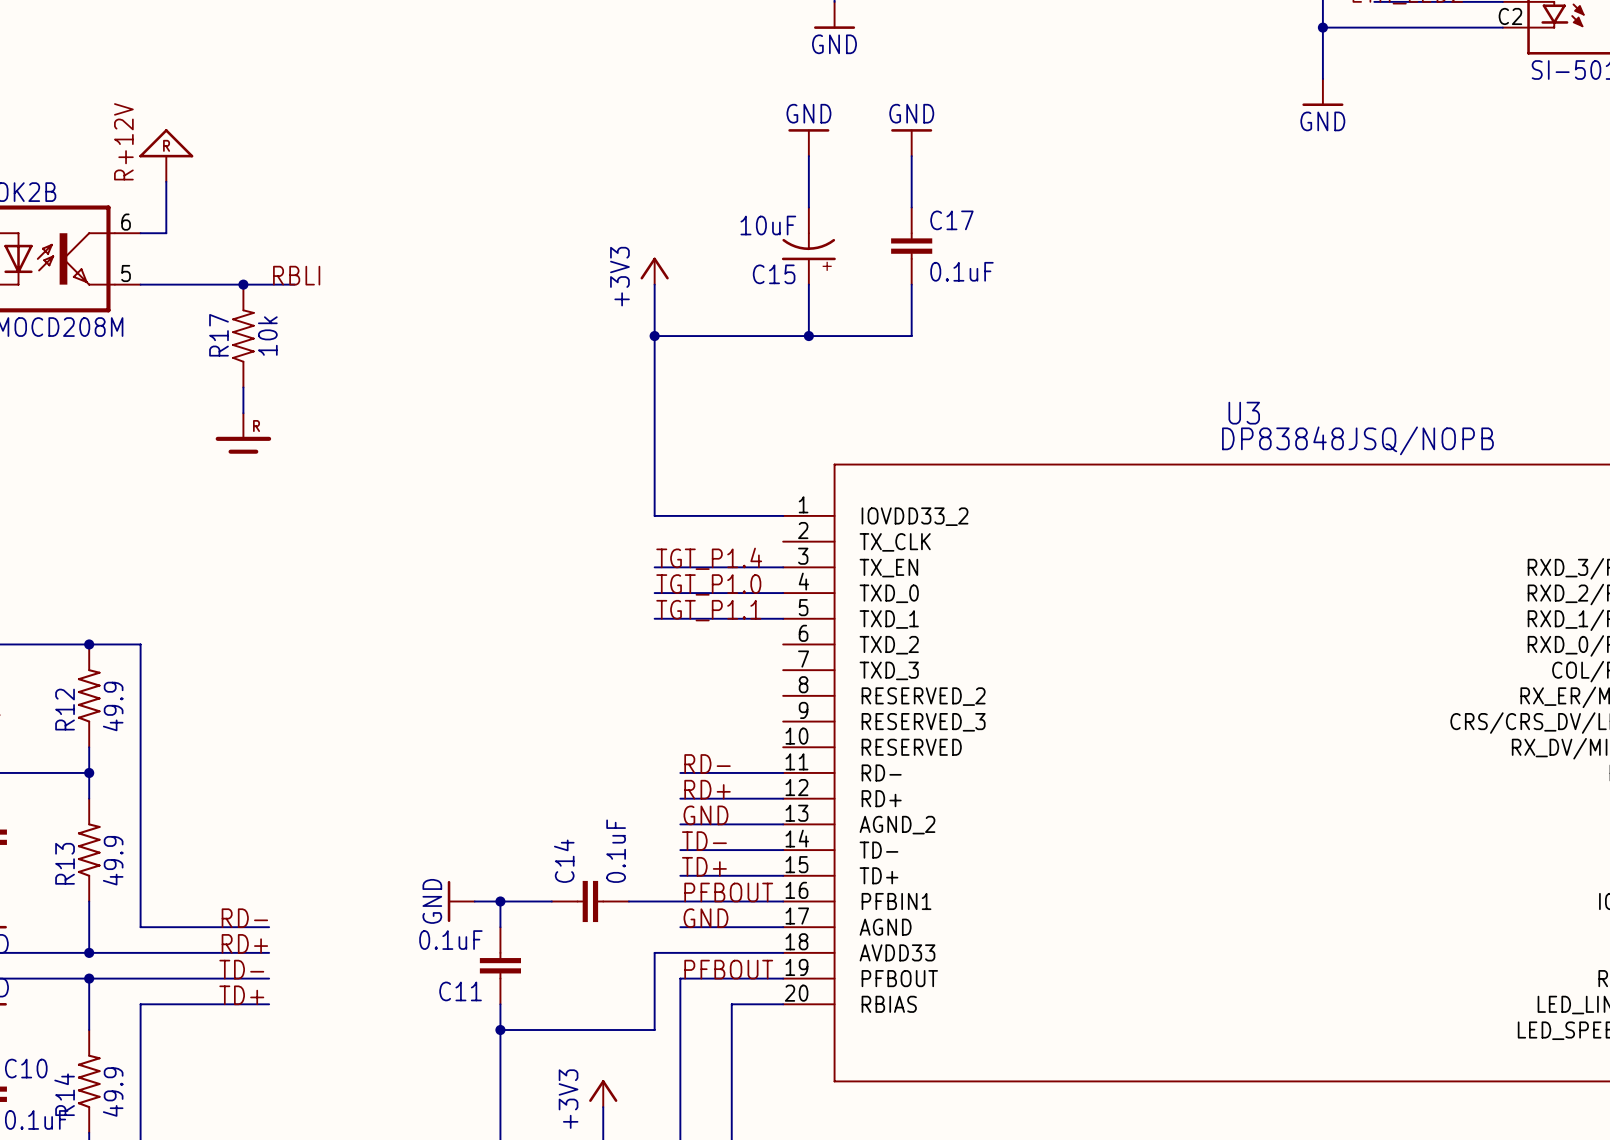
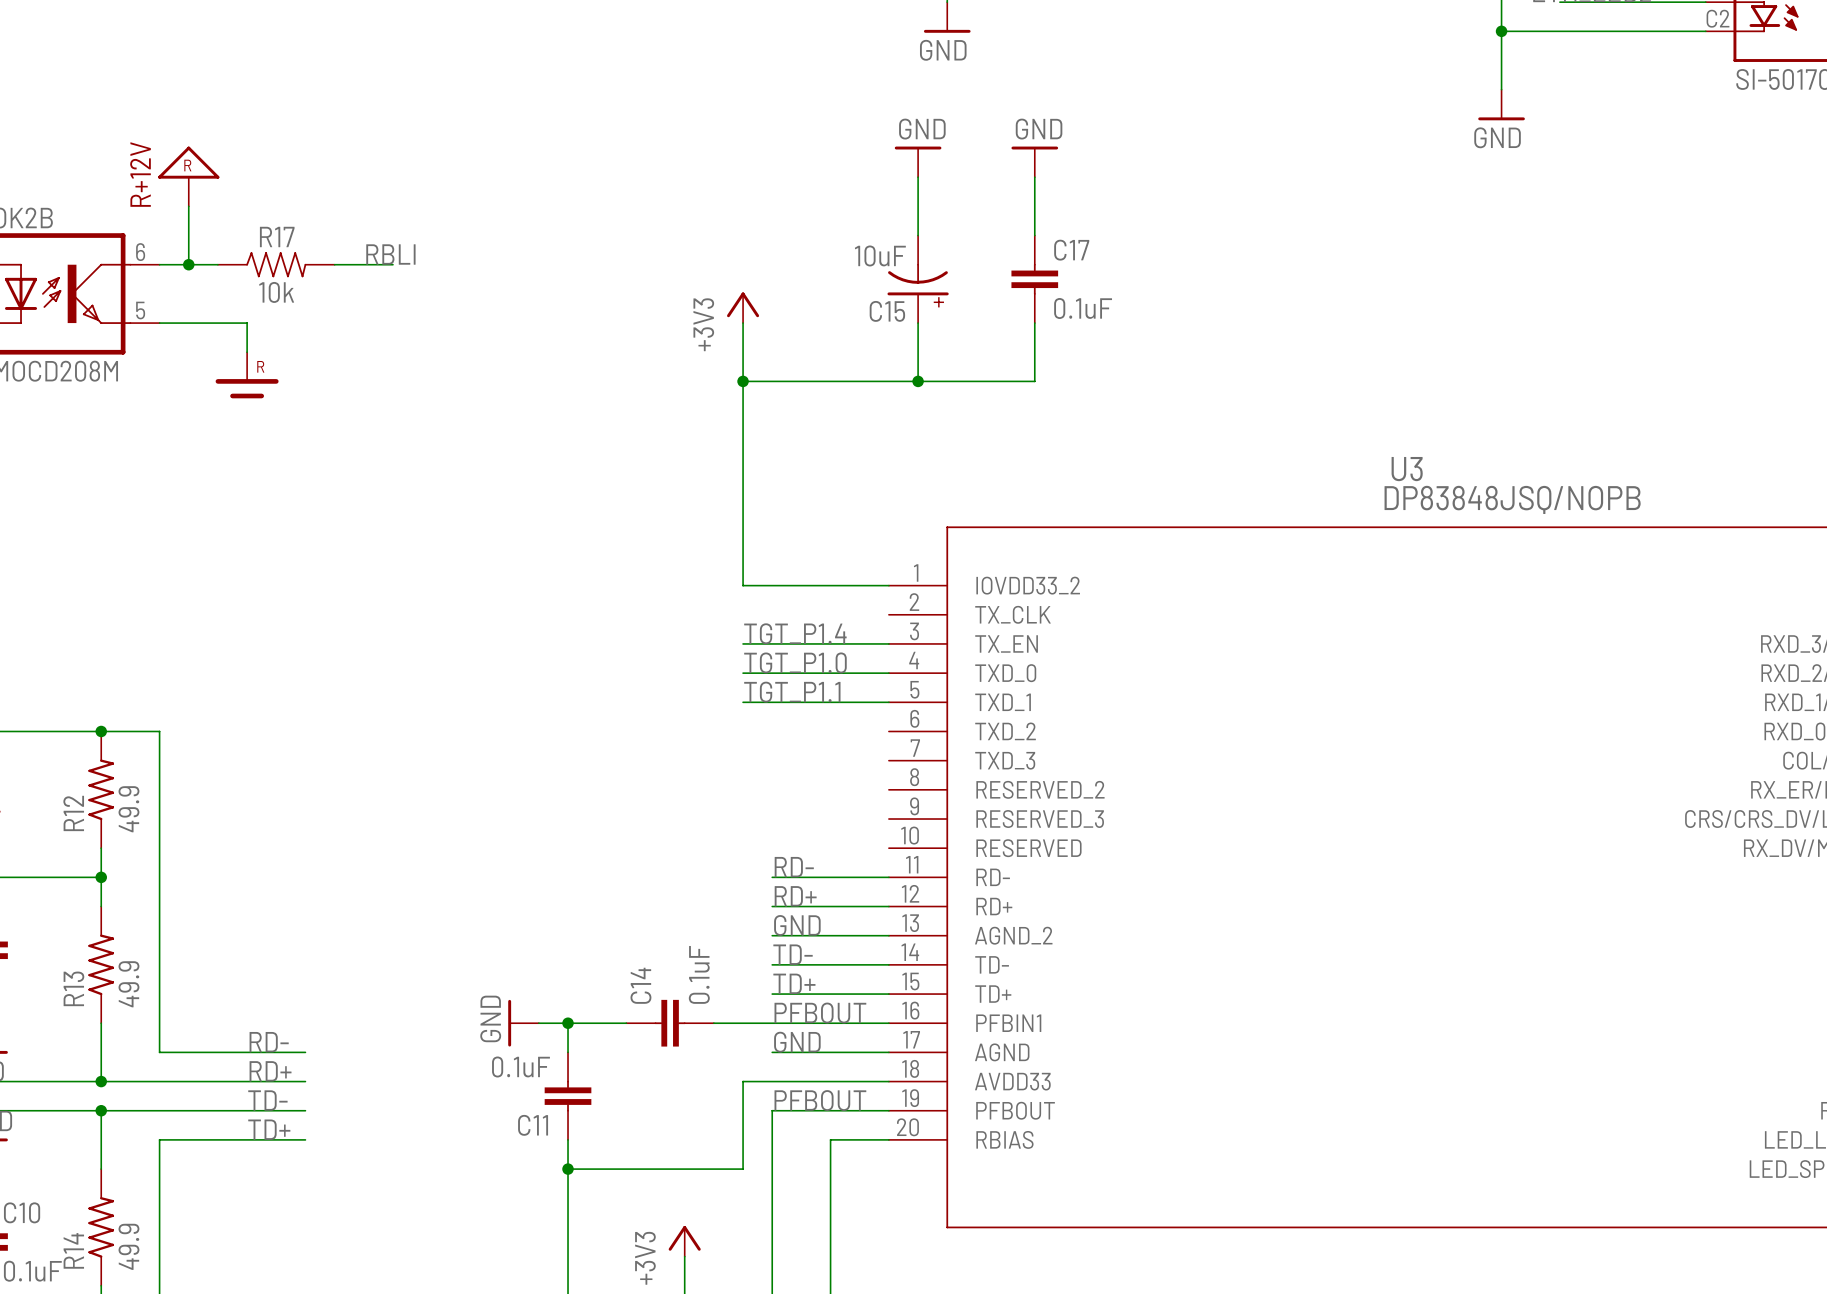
wire: none -> (188, 264) (217, 264)
junction: none -> (188, 264)
wire: none -> (334, 264) (392, 264)
label position: RBLI (296, 275) -> RBLI (390, 254)
wire: (217, 284) (294, 284) -> (247, 323) (247, 352)
junction: (243, 284) -> none
R17 rotation: 0° (243, 336) -> 90° clockwise (276, 264)
R17 position: (243, 336) -> (276, 264)
wire: (243, 387) (243, 413) -> none
power symbol position: (243, 433) -> (247, 375)

